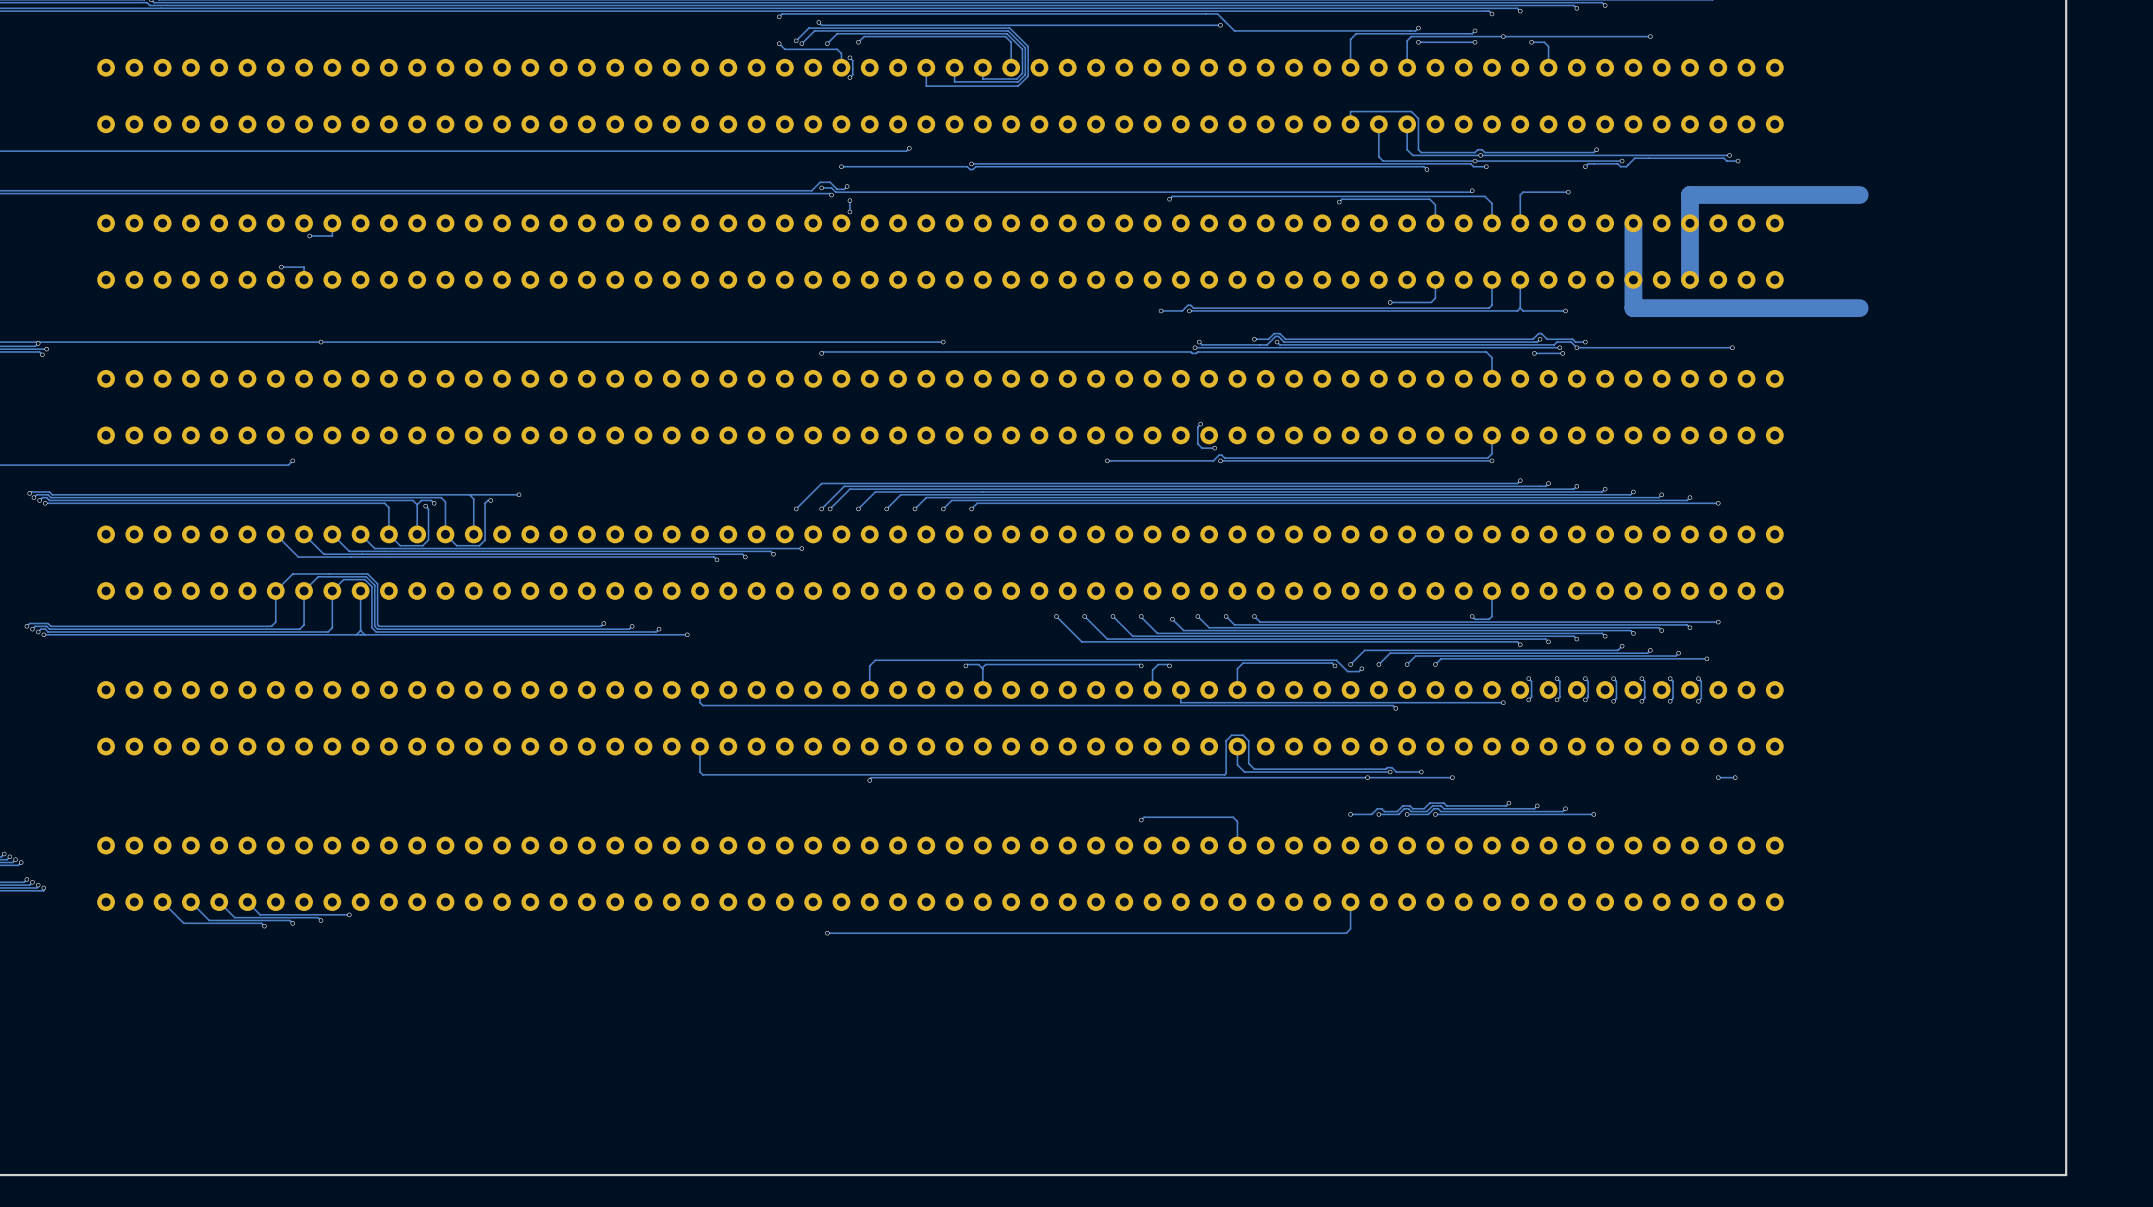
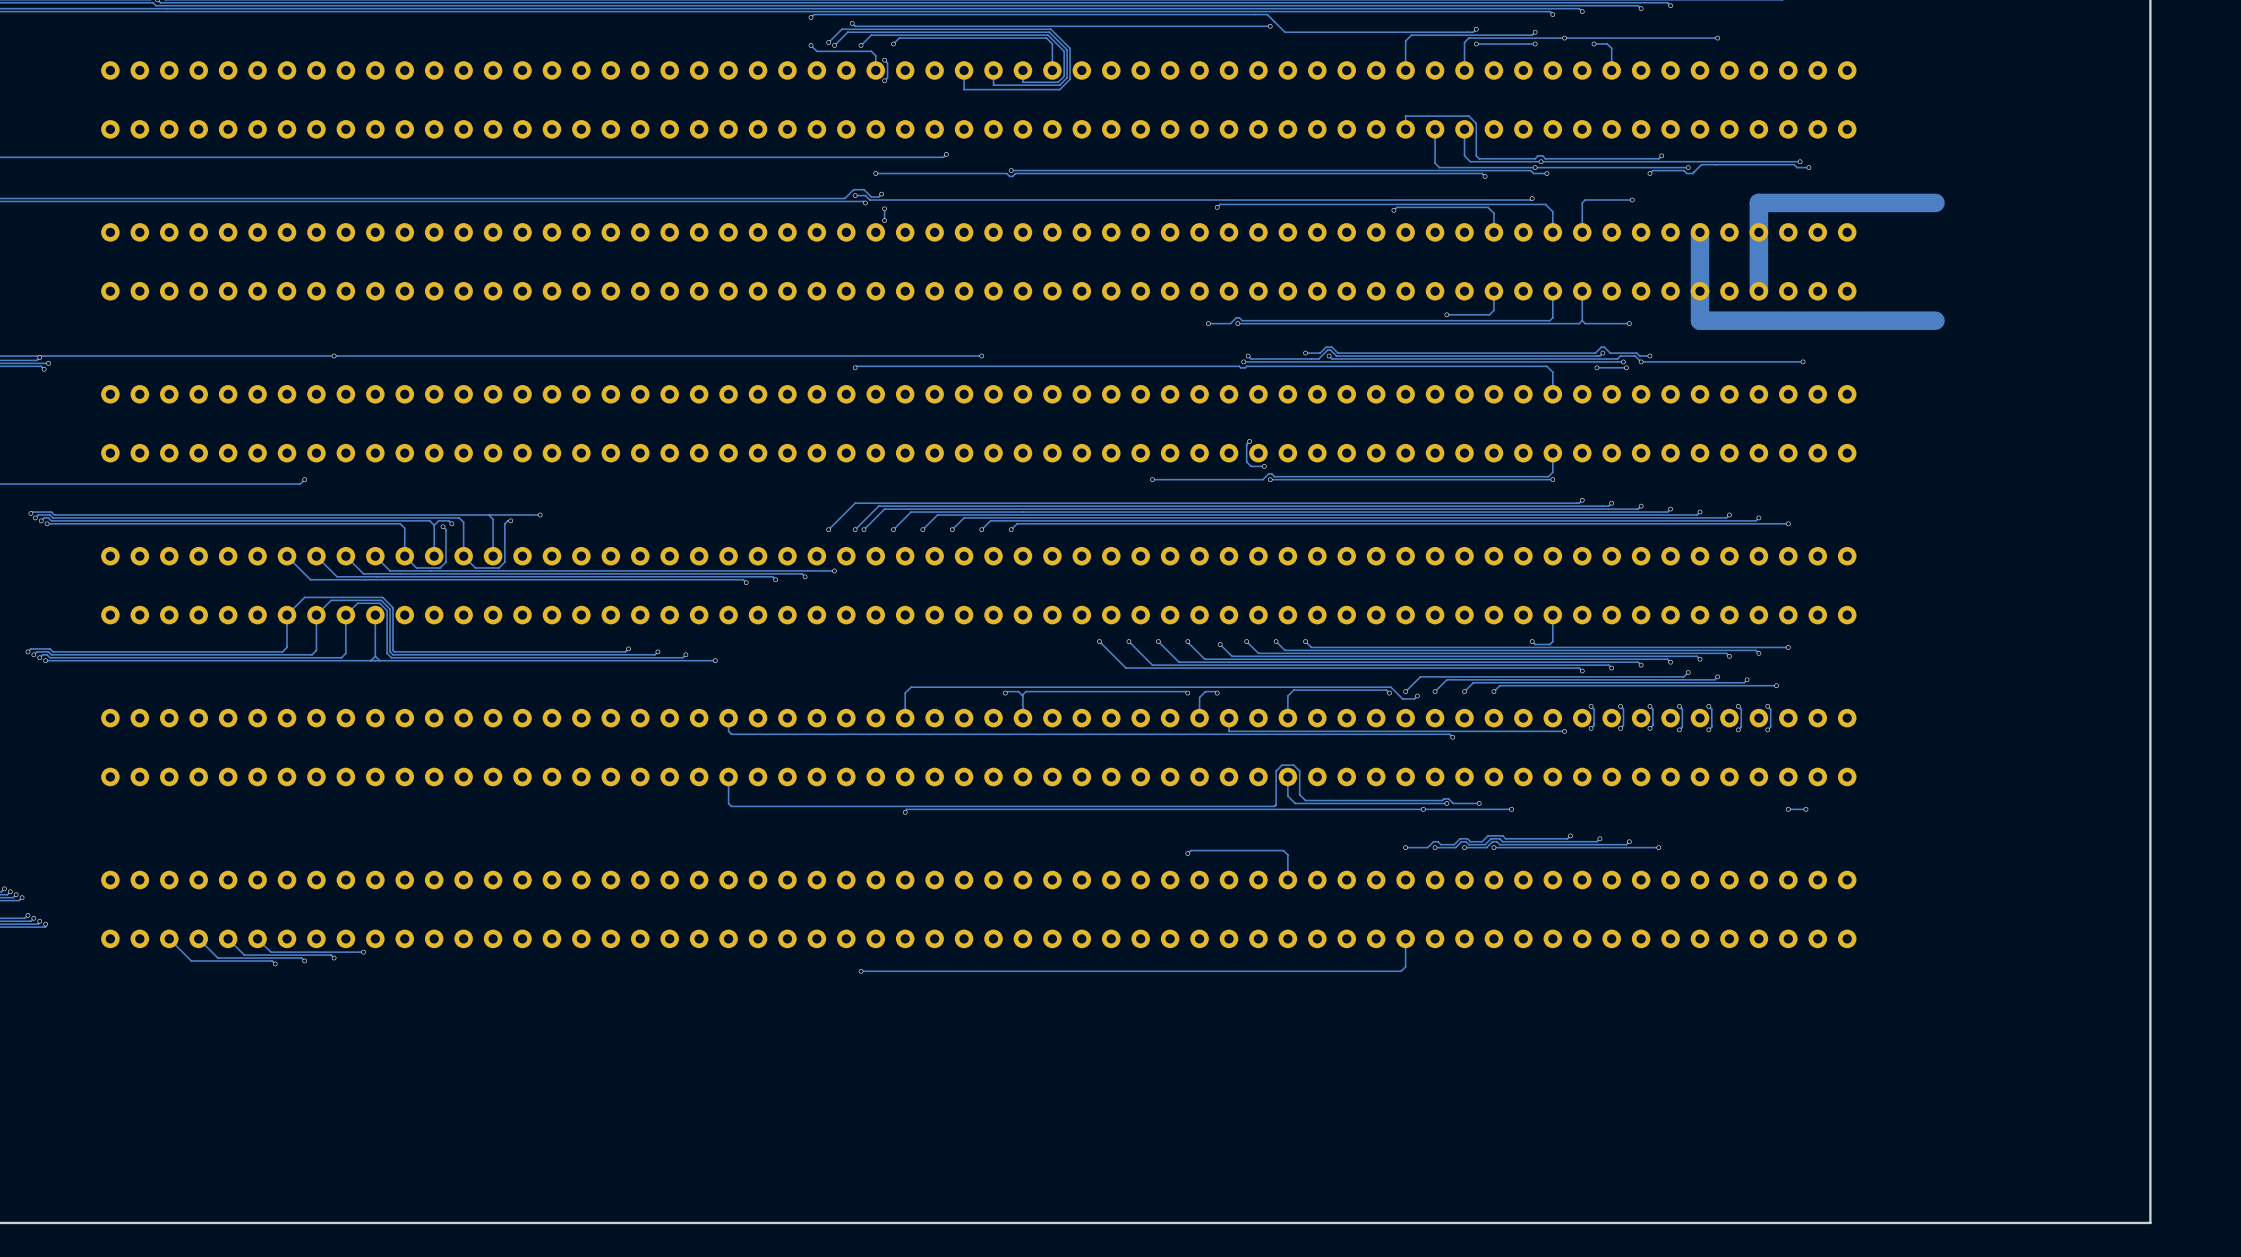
track: (332, 223) (332, 236) (309, 236) -> none
via: (309, 236) -> none
track: (281, 267) (304, 267) (304, 279) -> none
via: (281, 267) -> none

